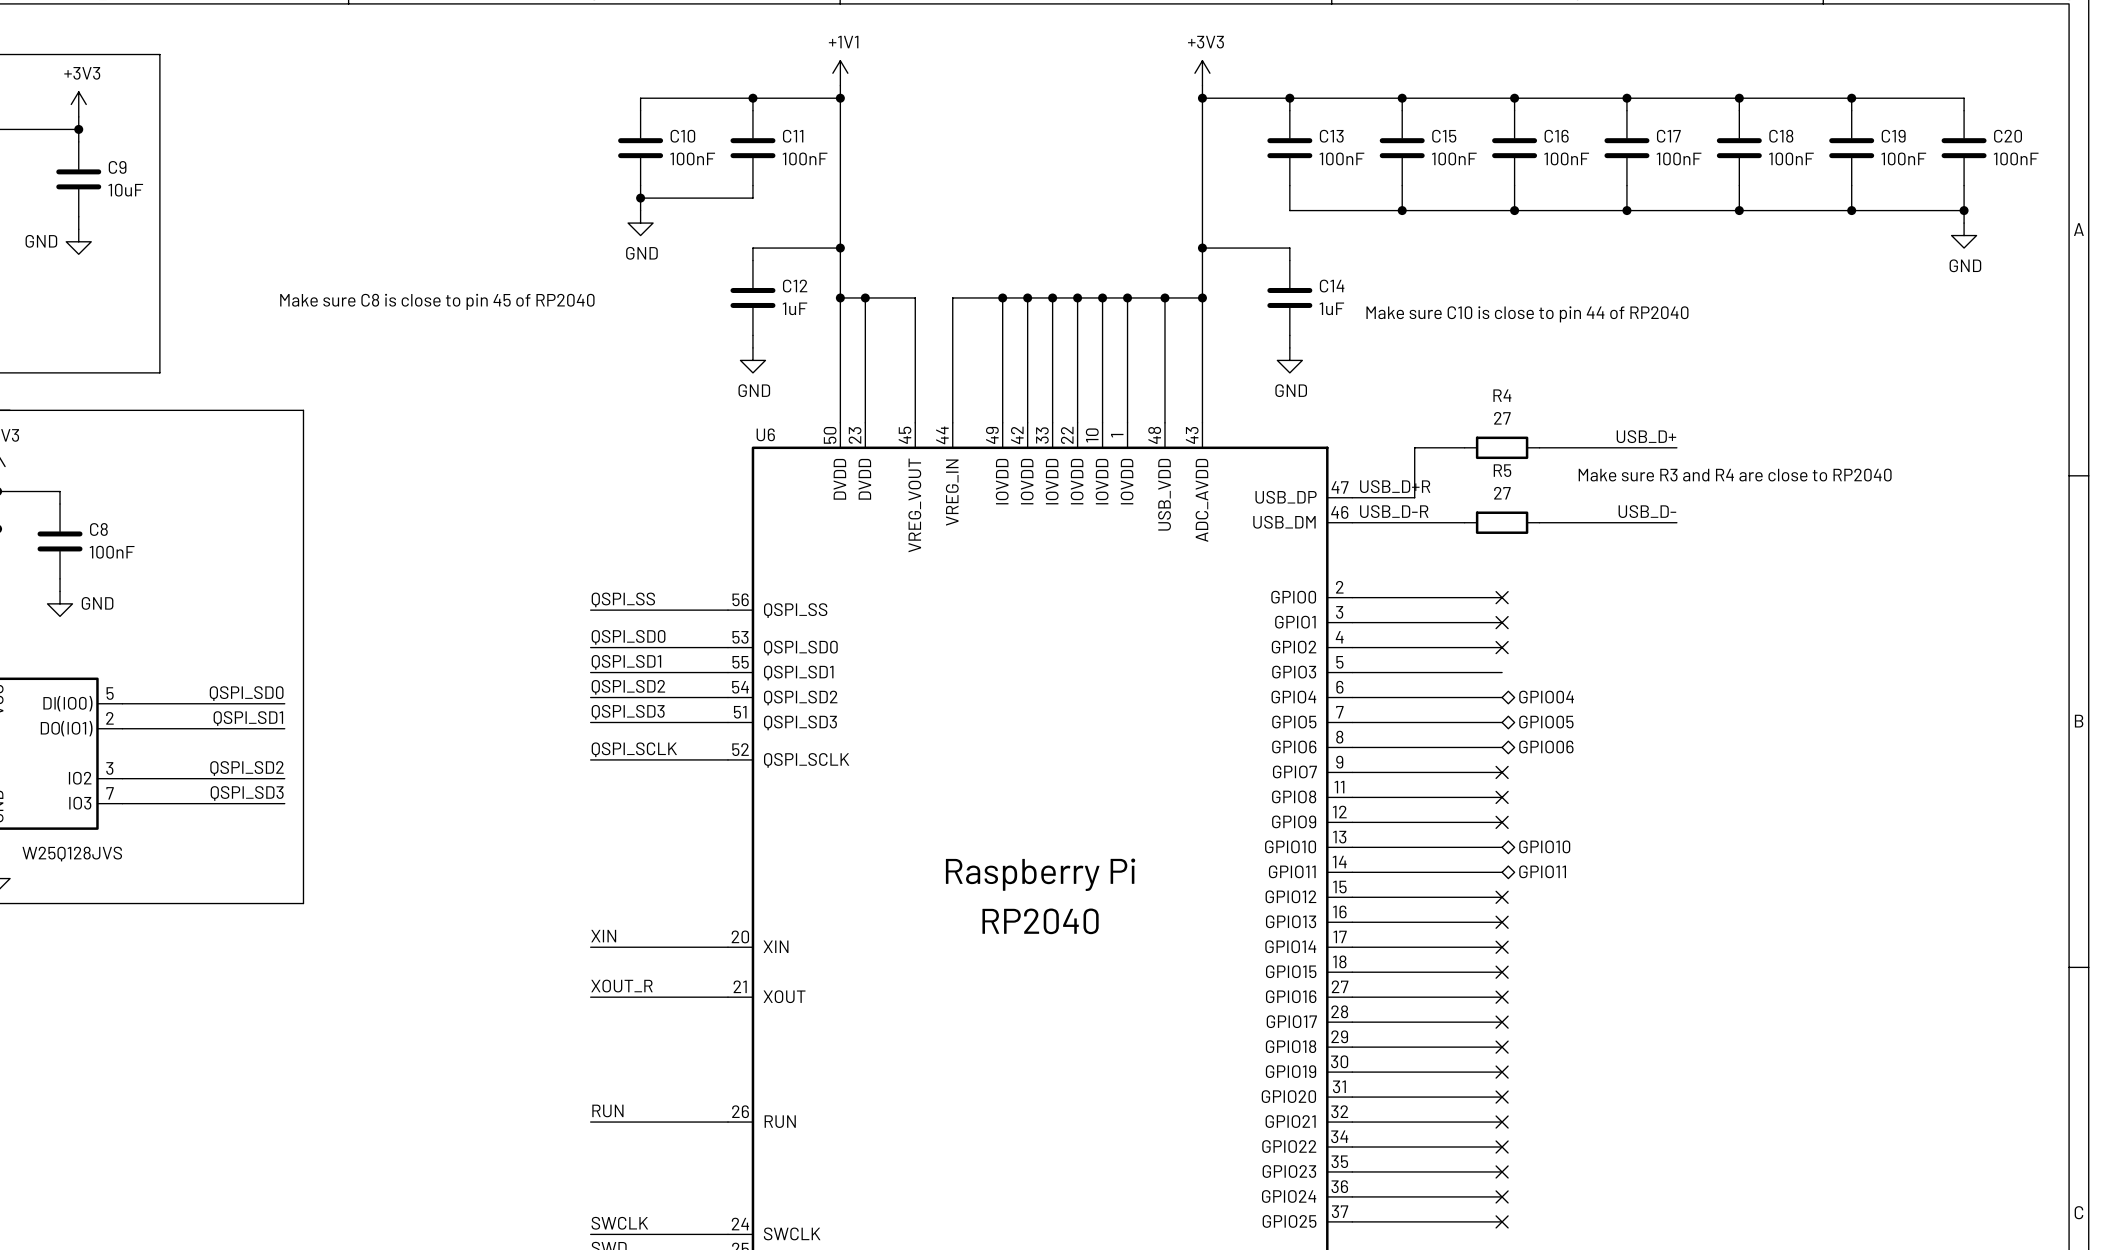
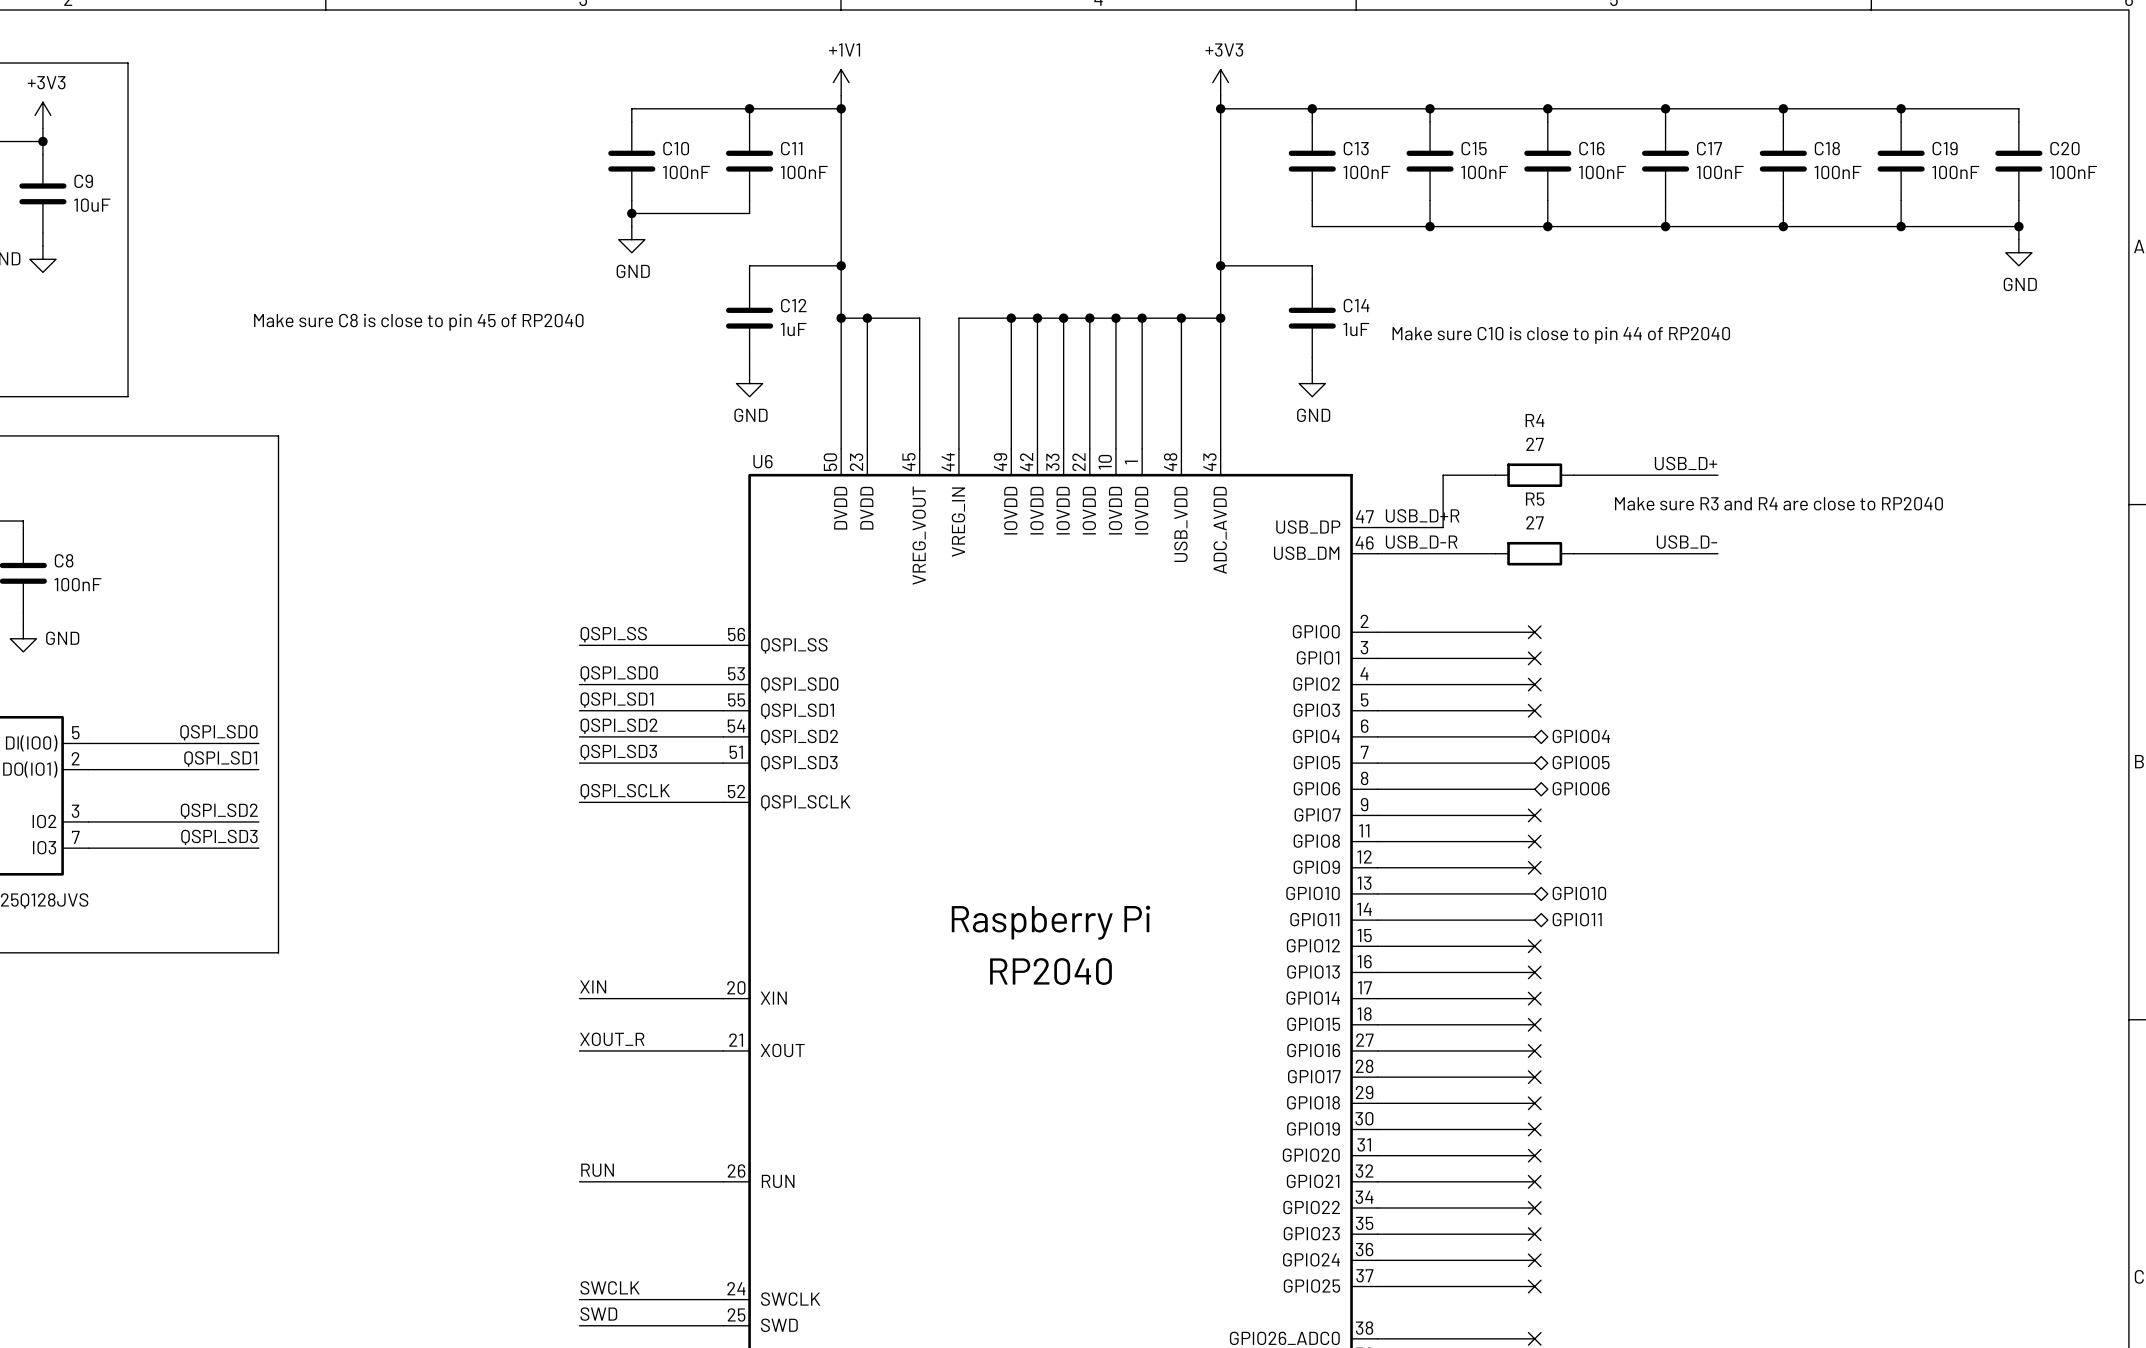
no-connect mark: none -> (1534, 710)

